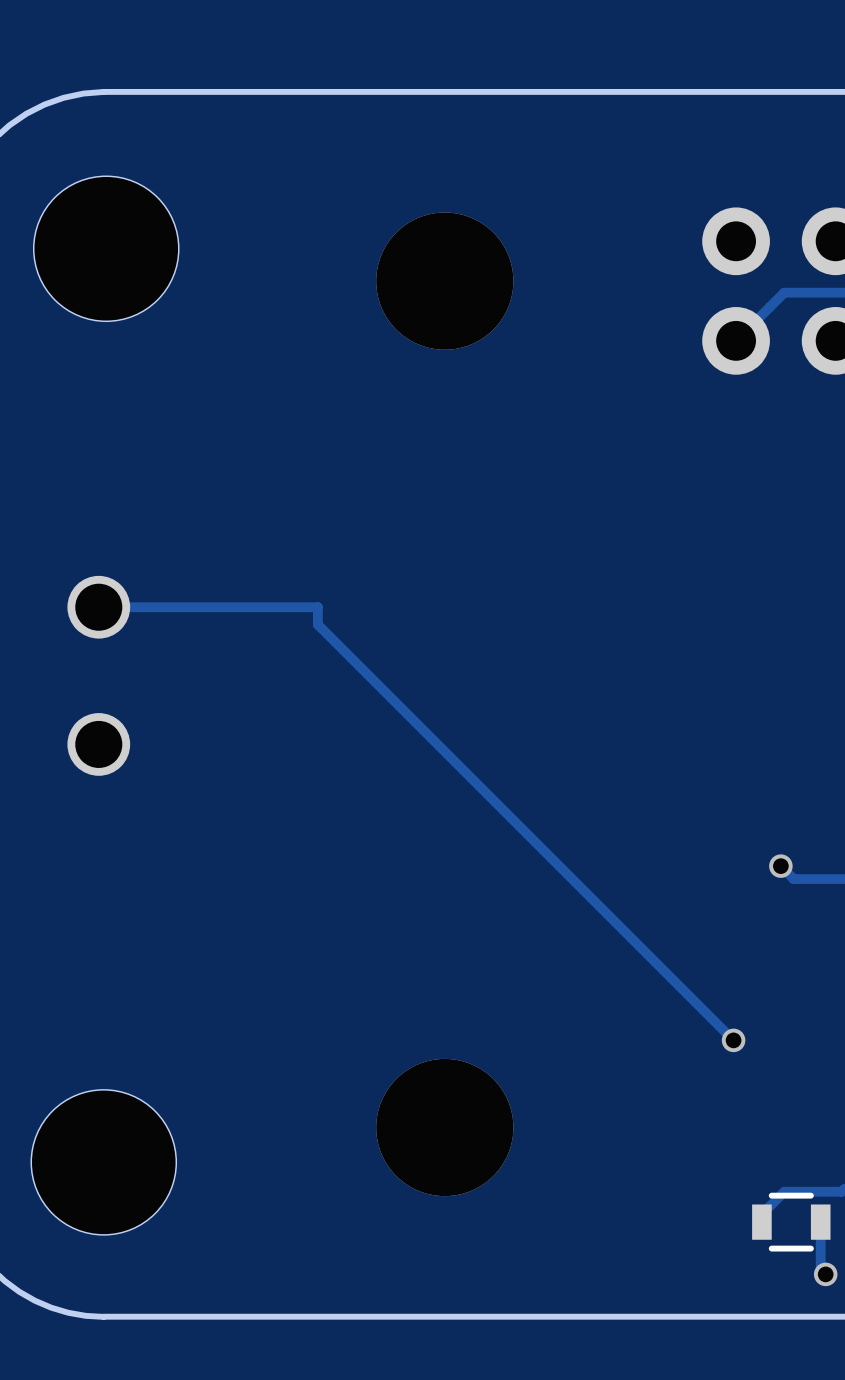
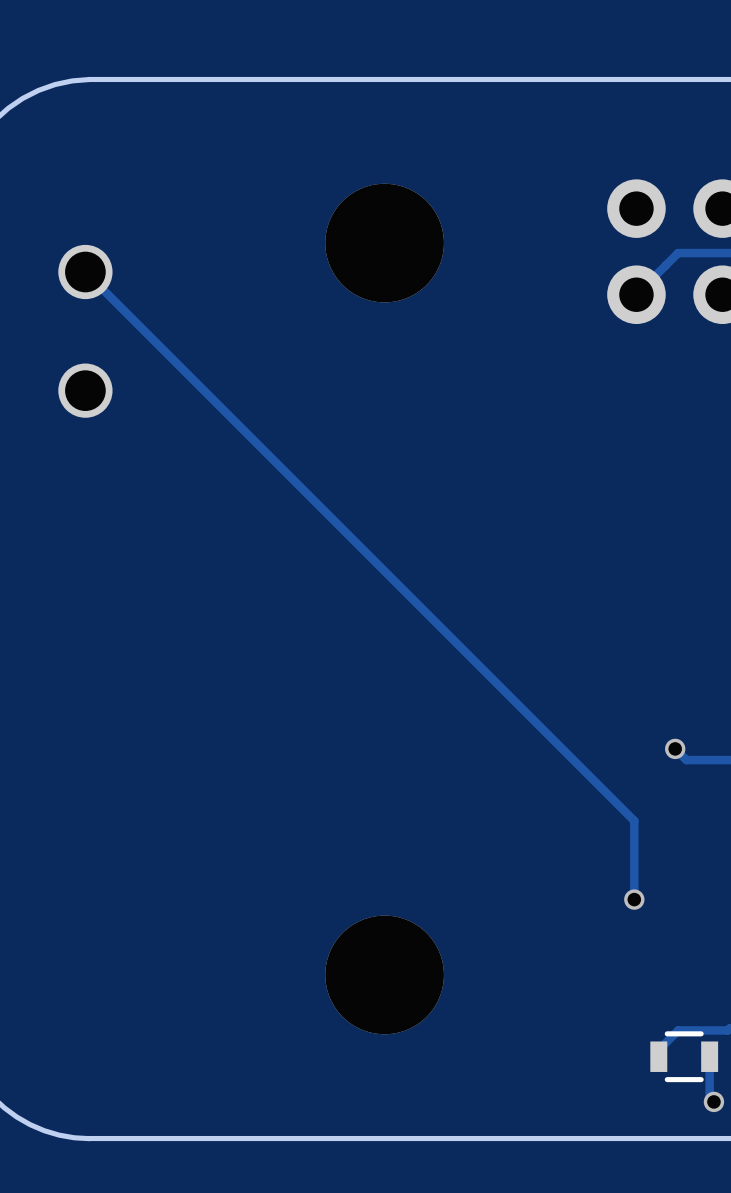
part: (106, 248) -> none
track: (98, 607) (317, 607) (317, 624) (733, 1040) -> (85, 272) (634, 820) (634, 899)
part position: (98, 675) -> (85, 331)
part: (103, 1162) -> none

